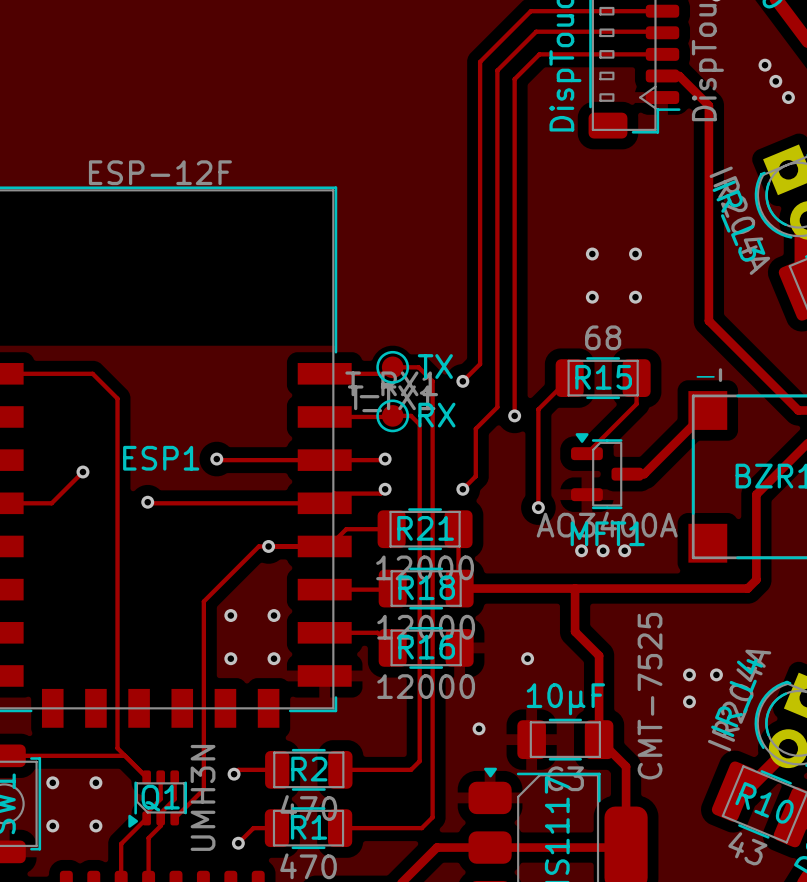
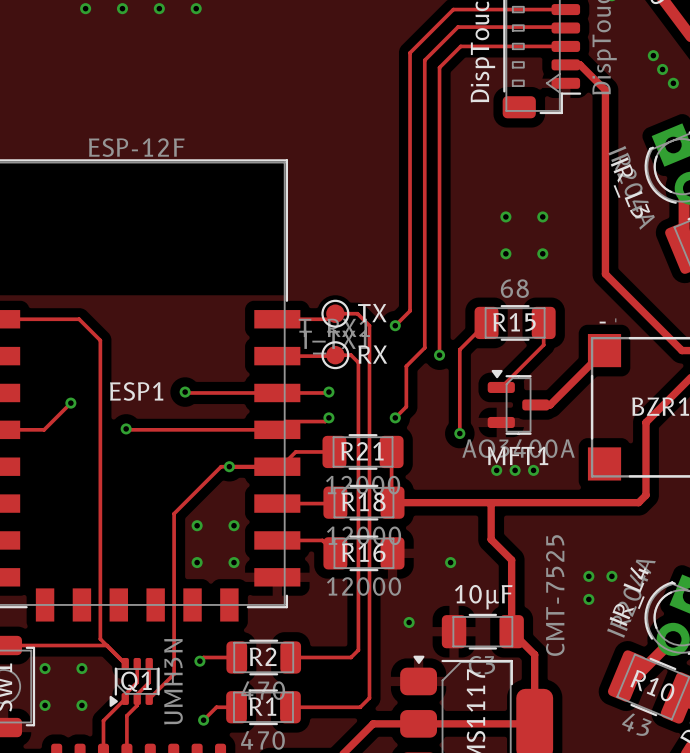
via: none -> (85, 8)
via: none -> (122, 8)
via: none -> (159, 8)
via: none -> (196, 8)

